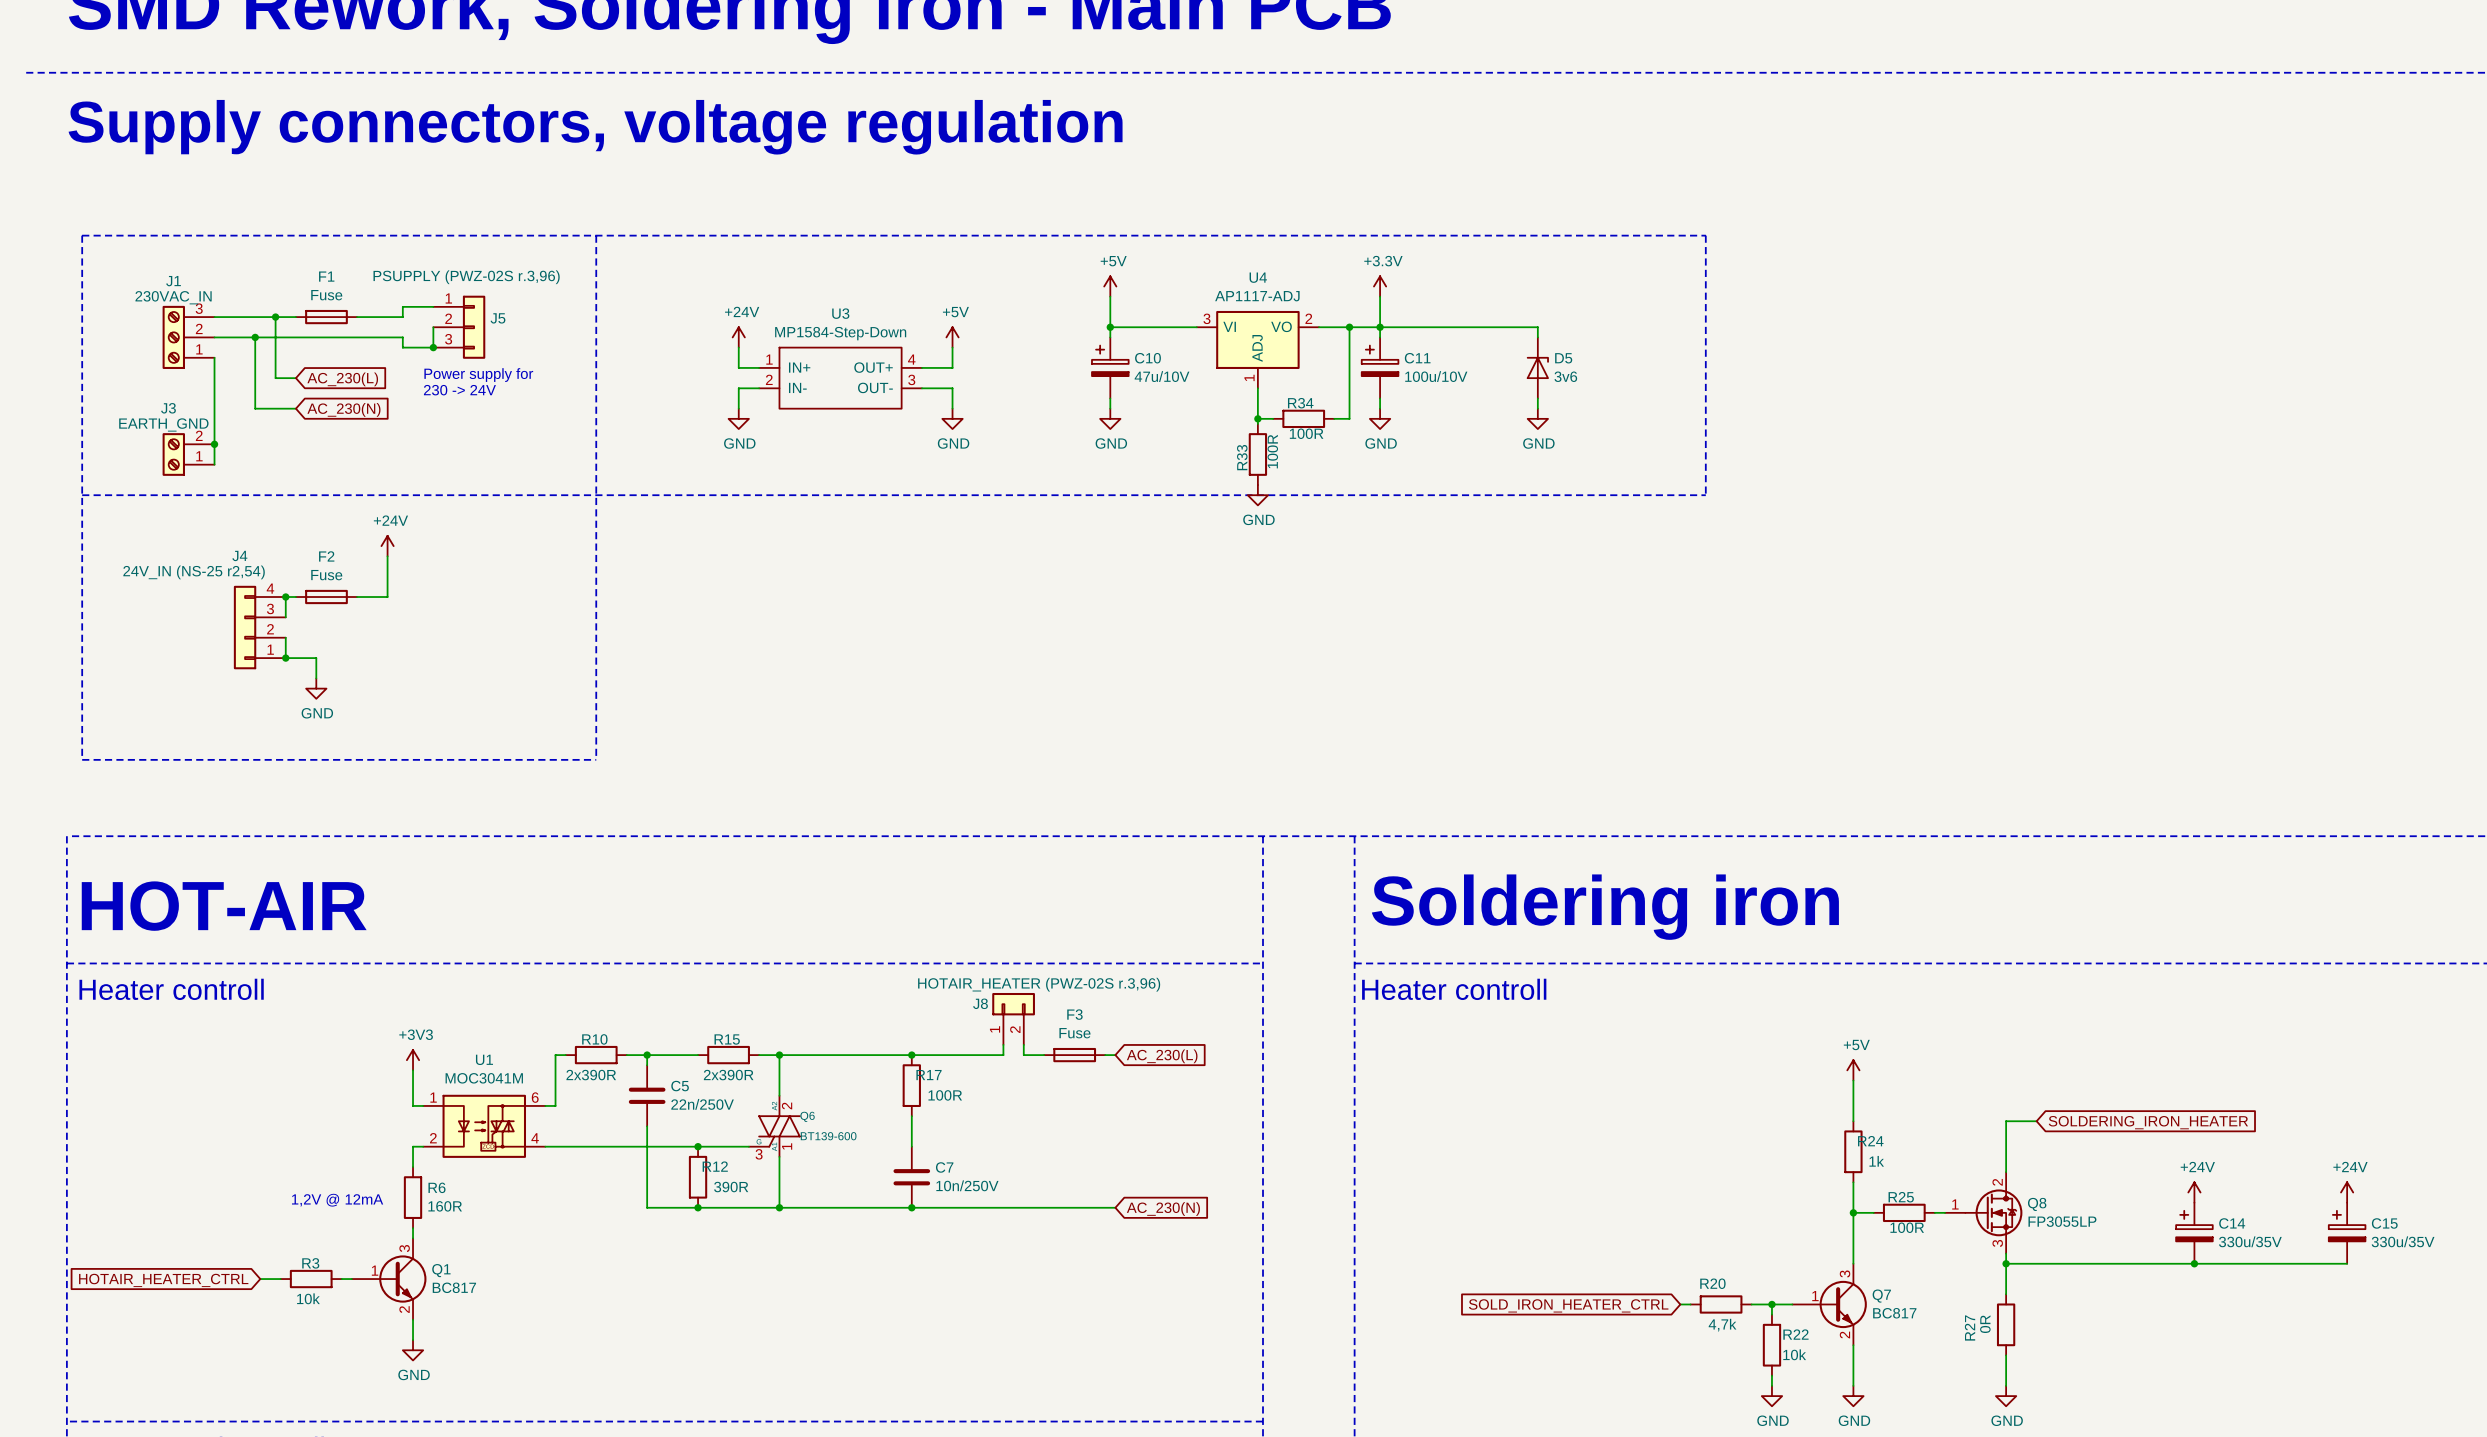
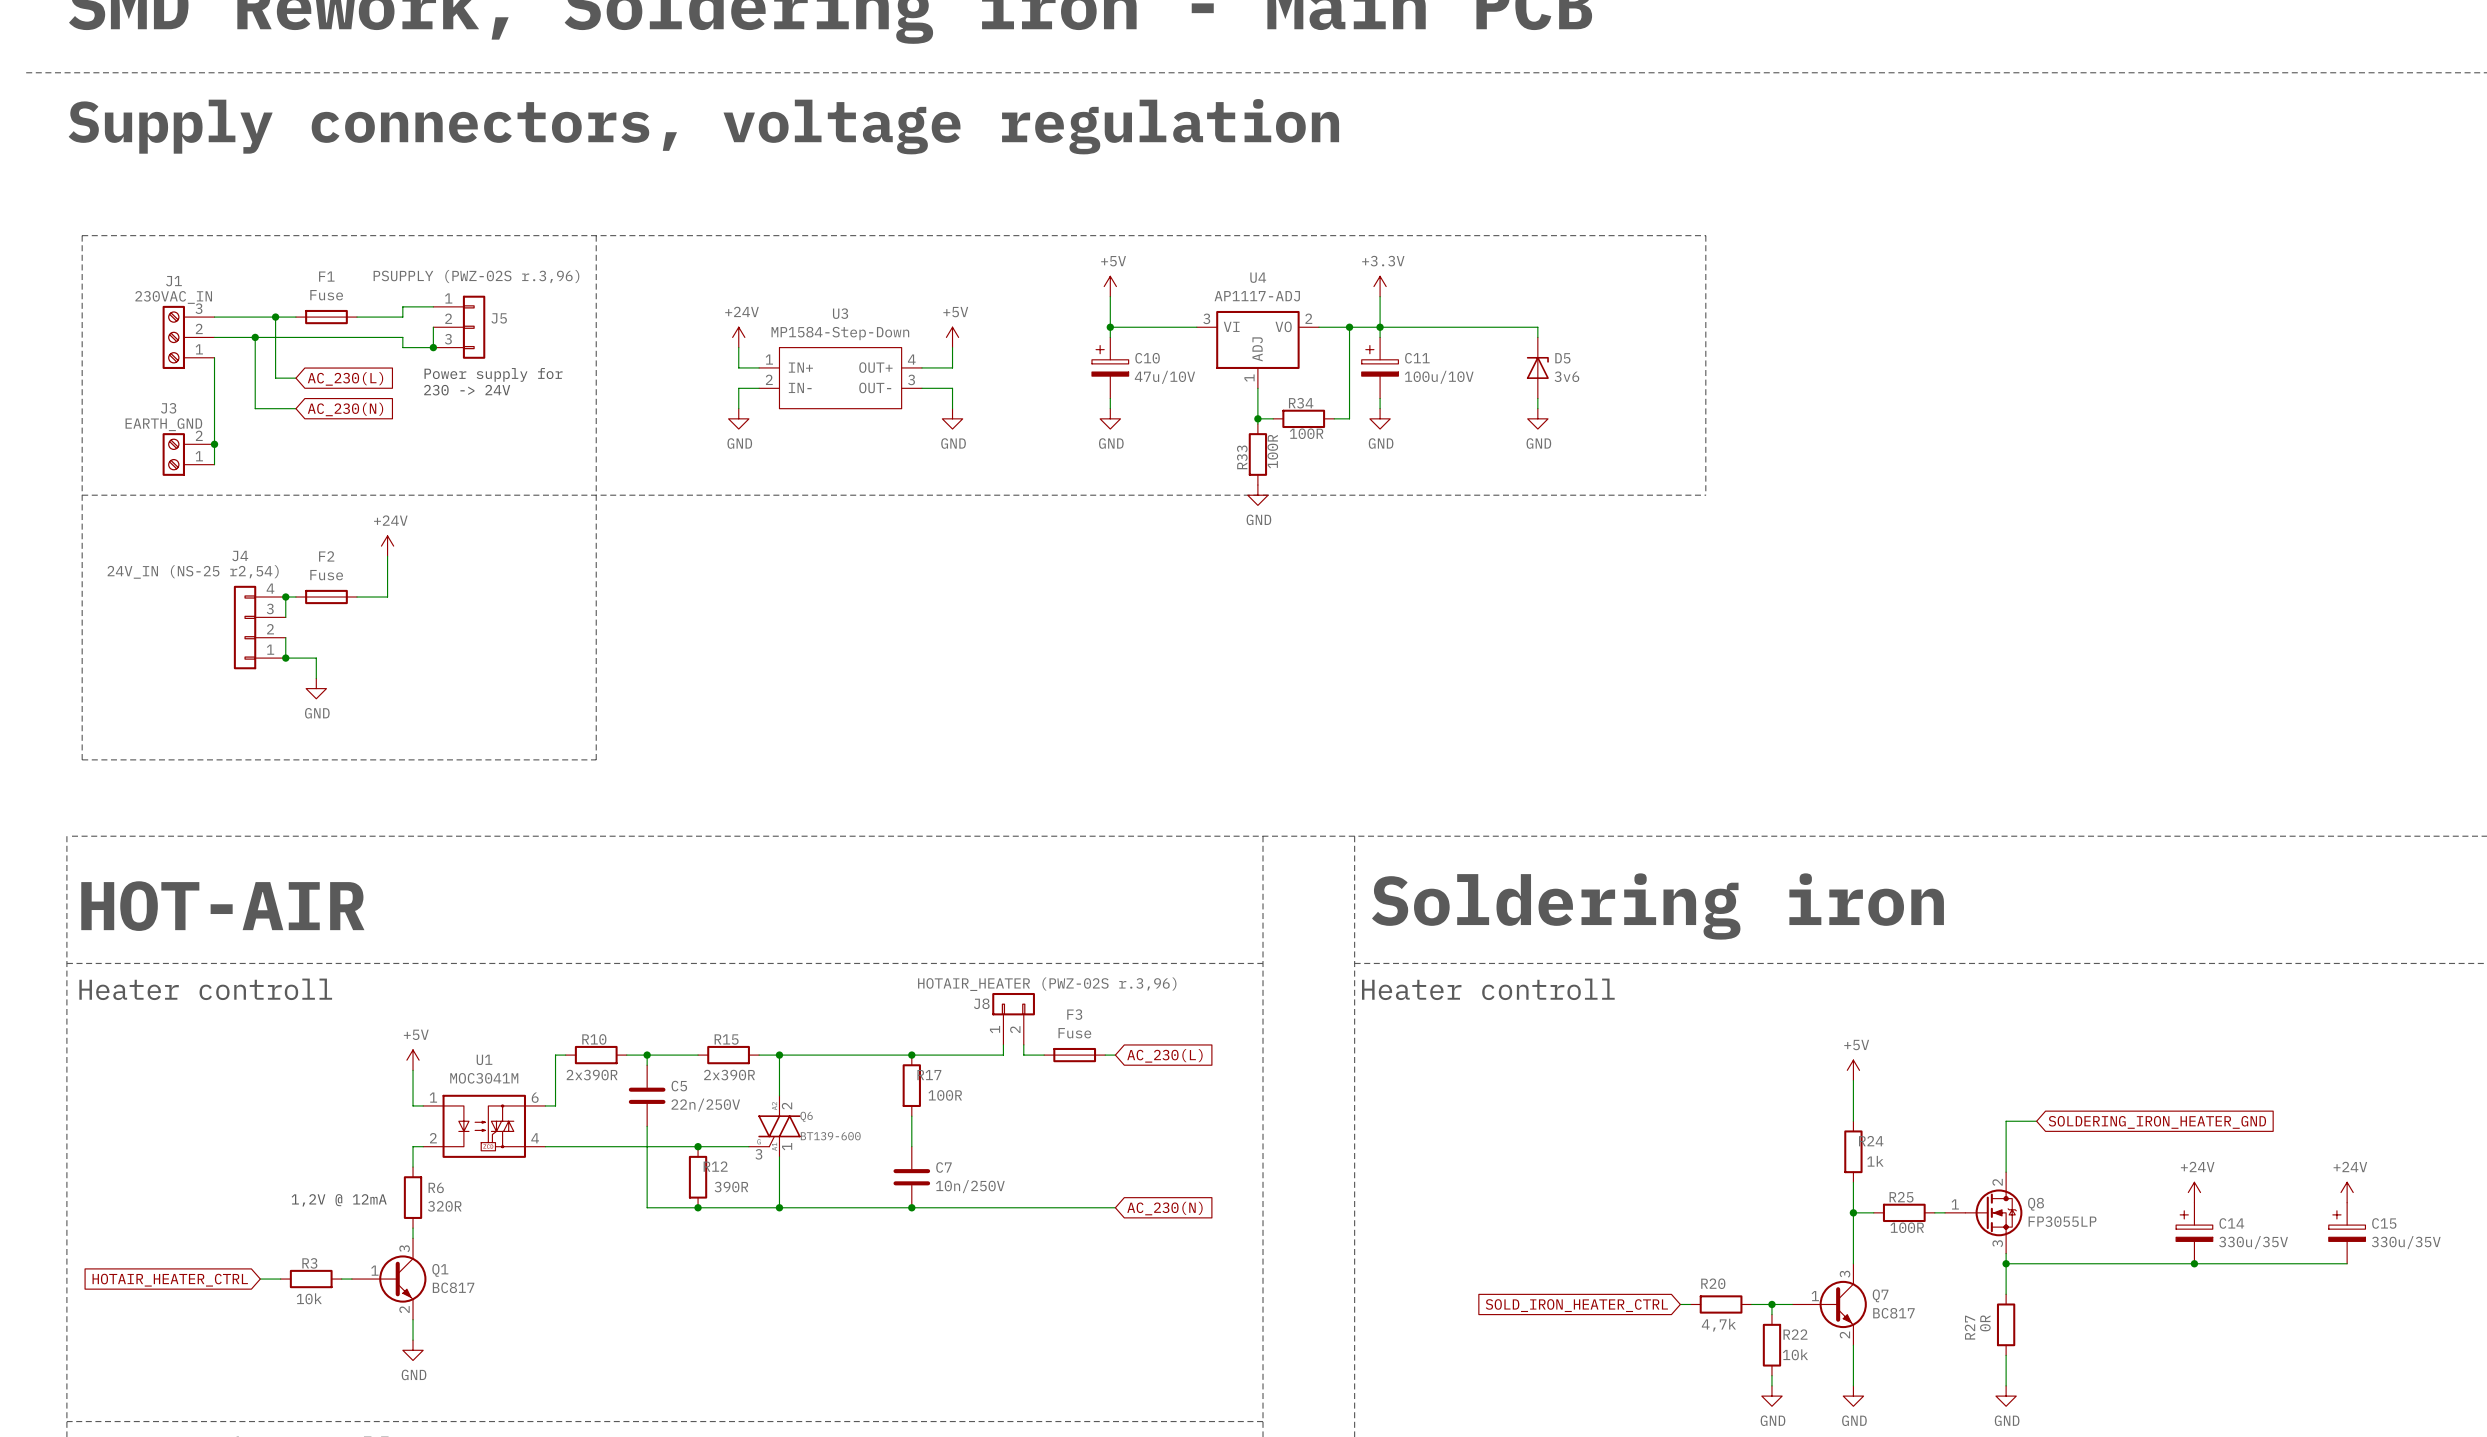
power symbol: +3V3 (413, 1060) -> +5V (413, 1060)
global label: SOLDERING_IRON_HEATER (2148, 1122) -> SOLDERING_IRON_HEATER_GND (2157, 1122)
R6 value: 160R (445, 1206) -> 320R (444, 1206)

